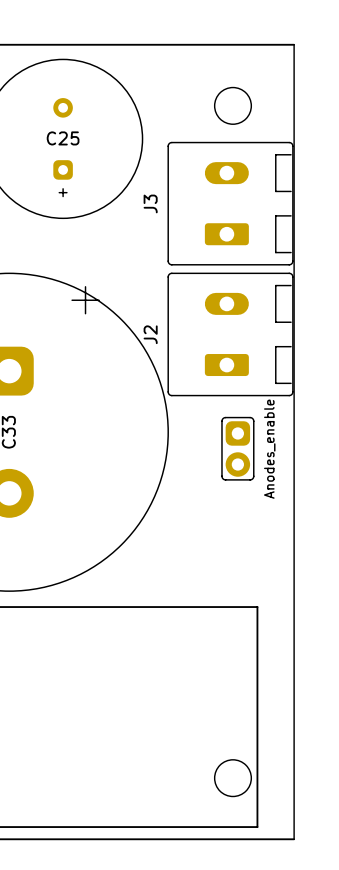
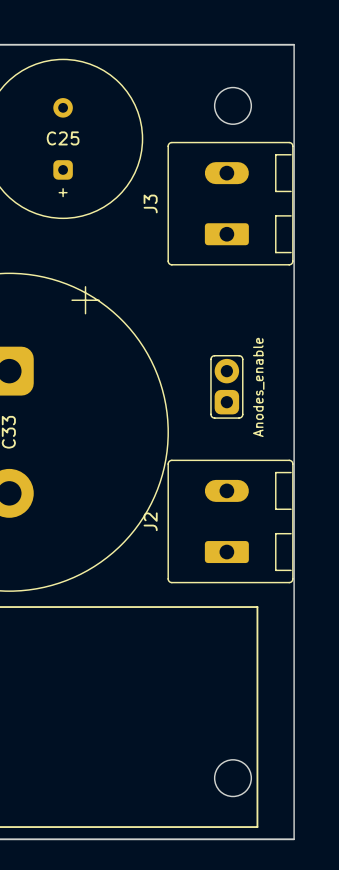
J2 position: (230, 334) -> (230, 521)
part rotation: 0° (237, 448) -> 180° (226, 386)
part position: (237, 448) -> (226, 386)

